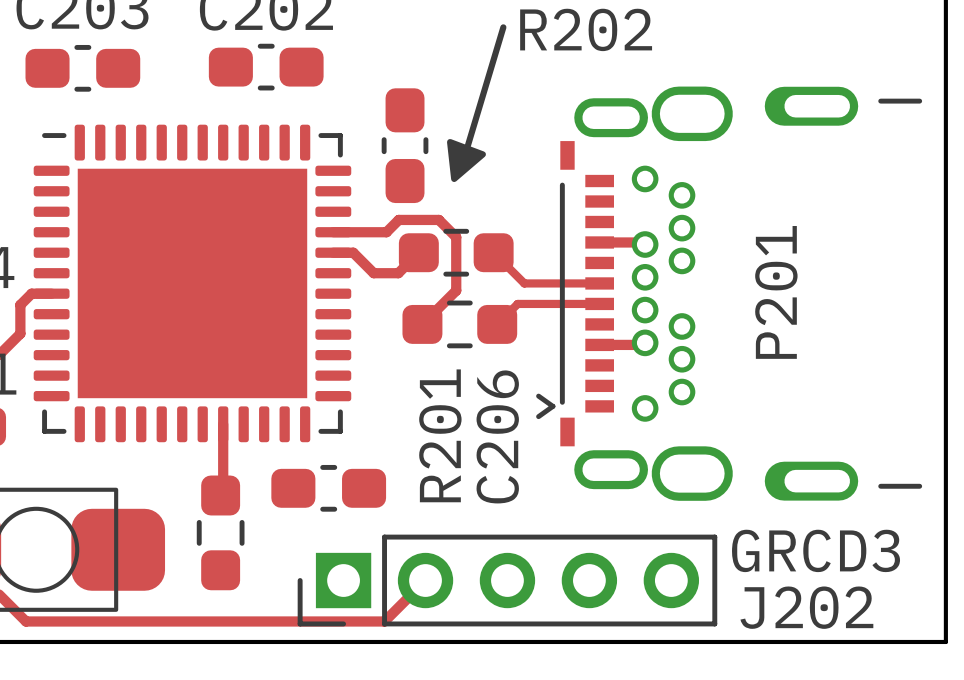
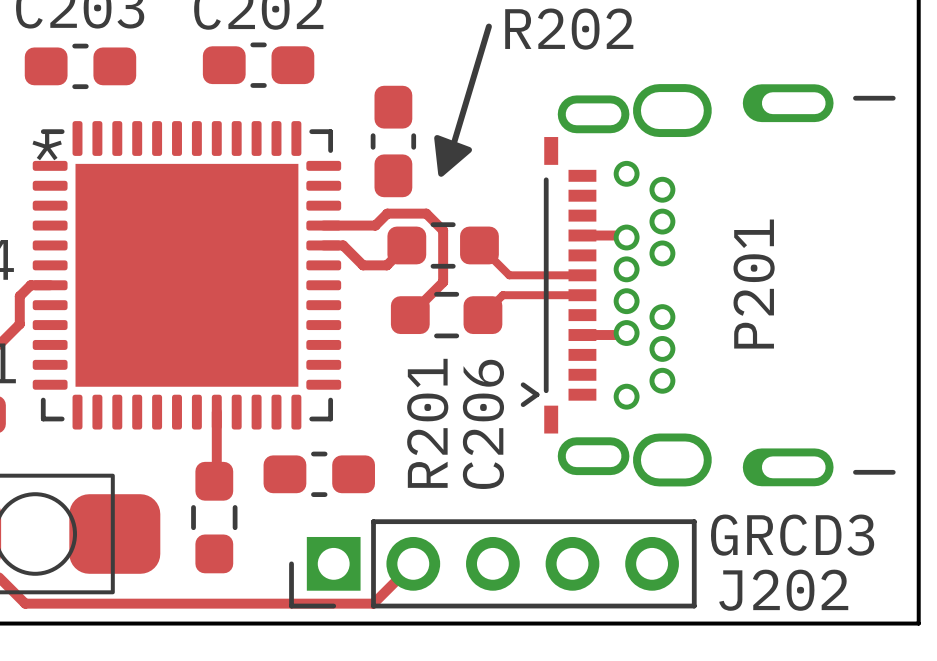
text: none -> * (47, 146)

